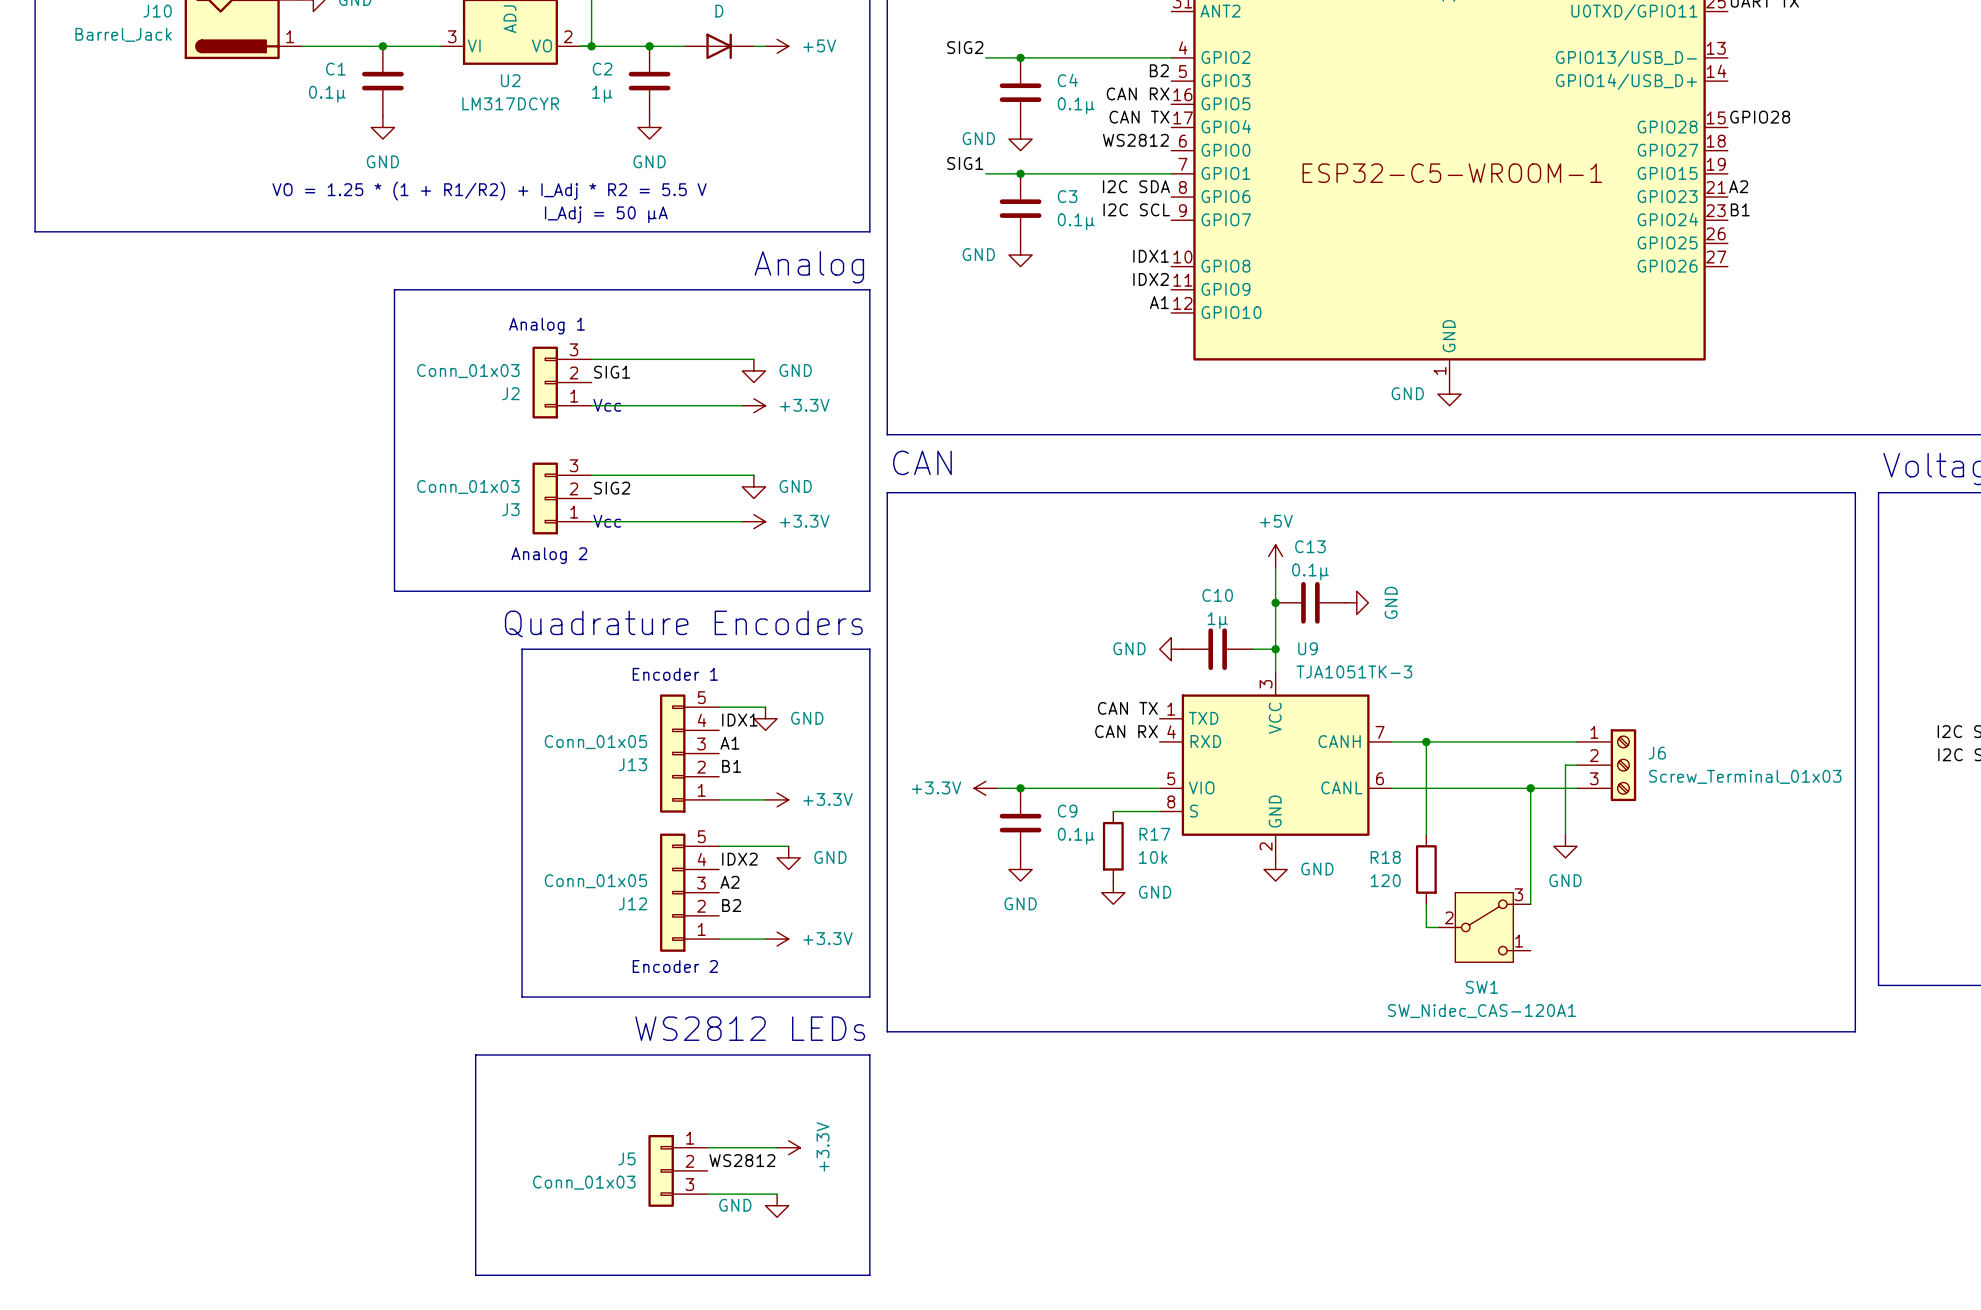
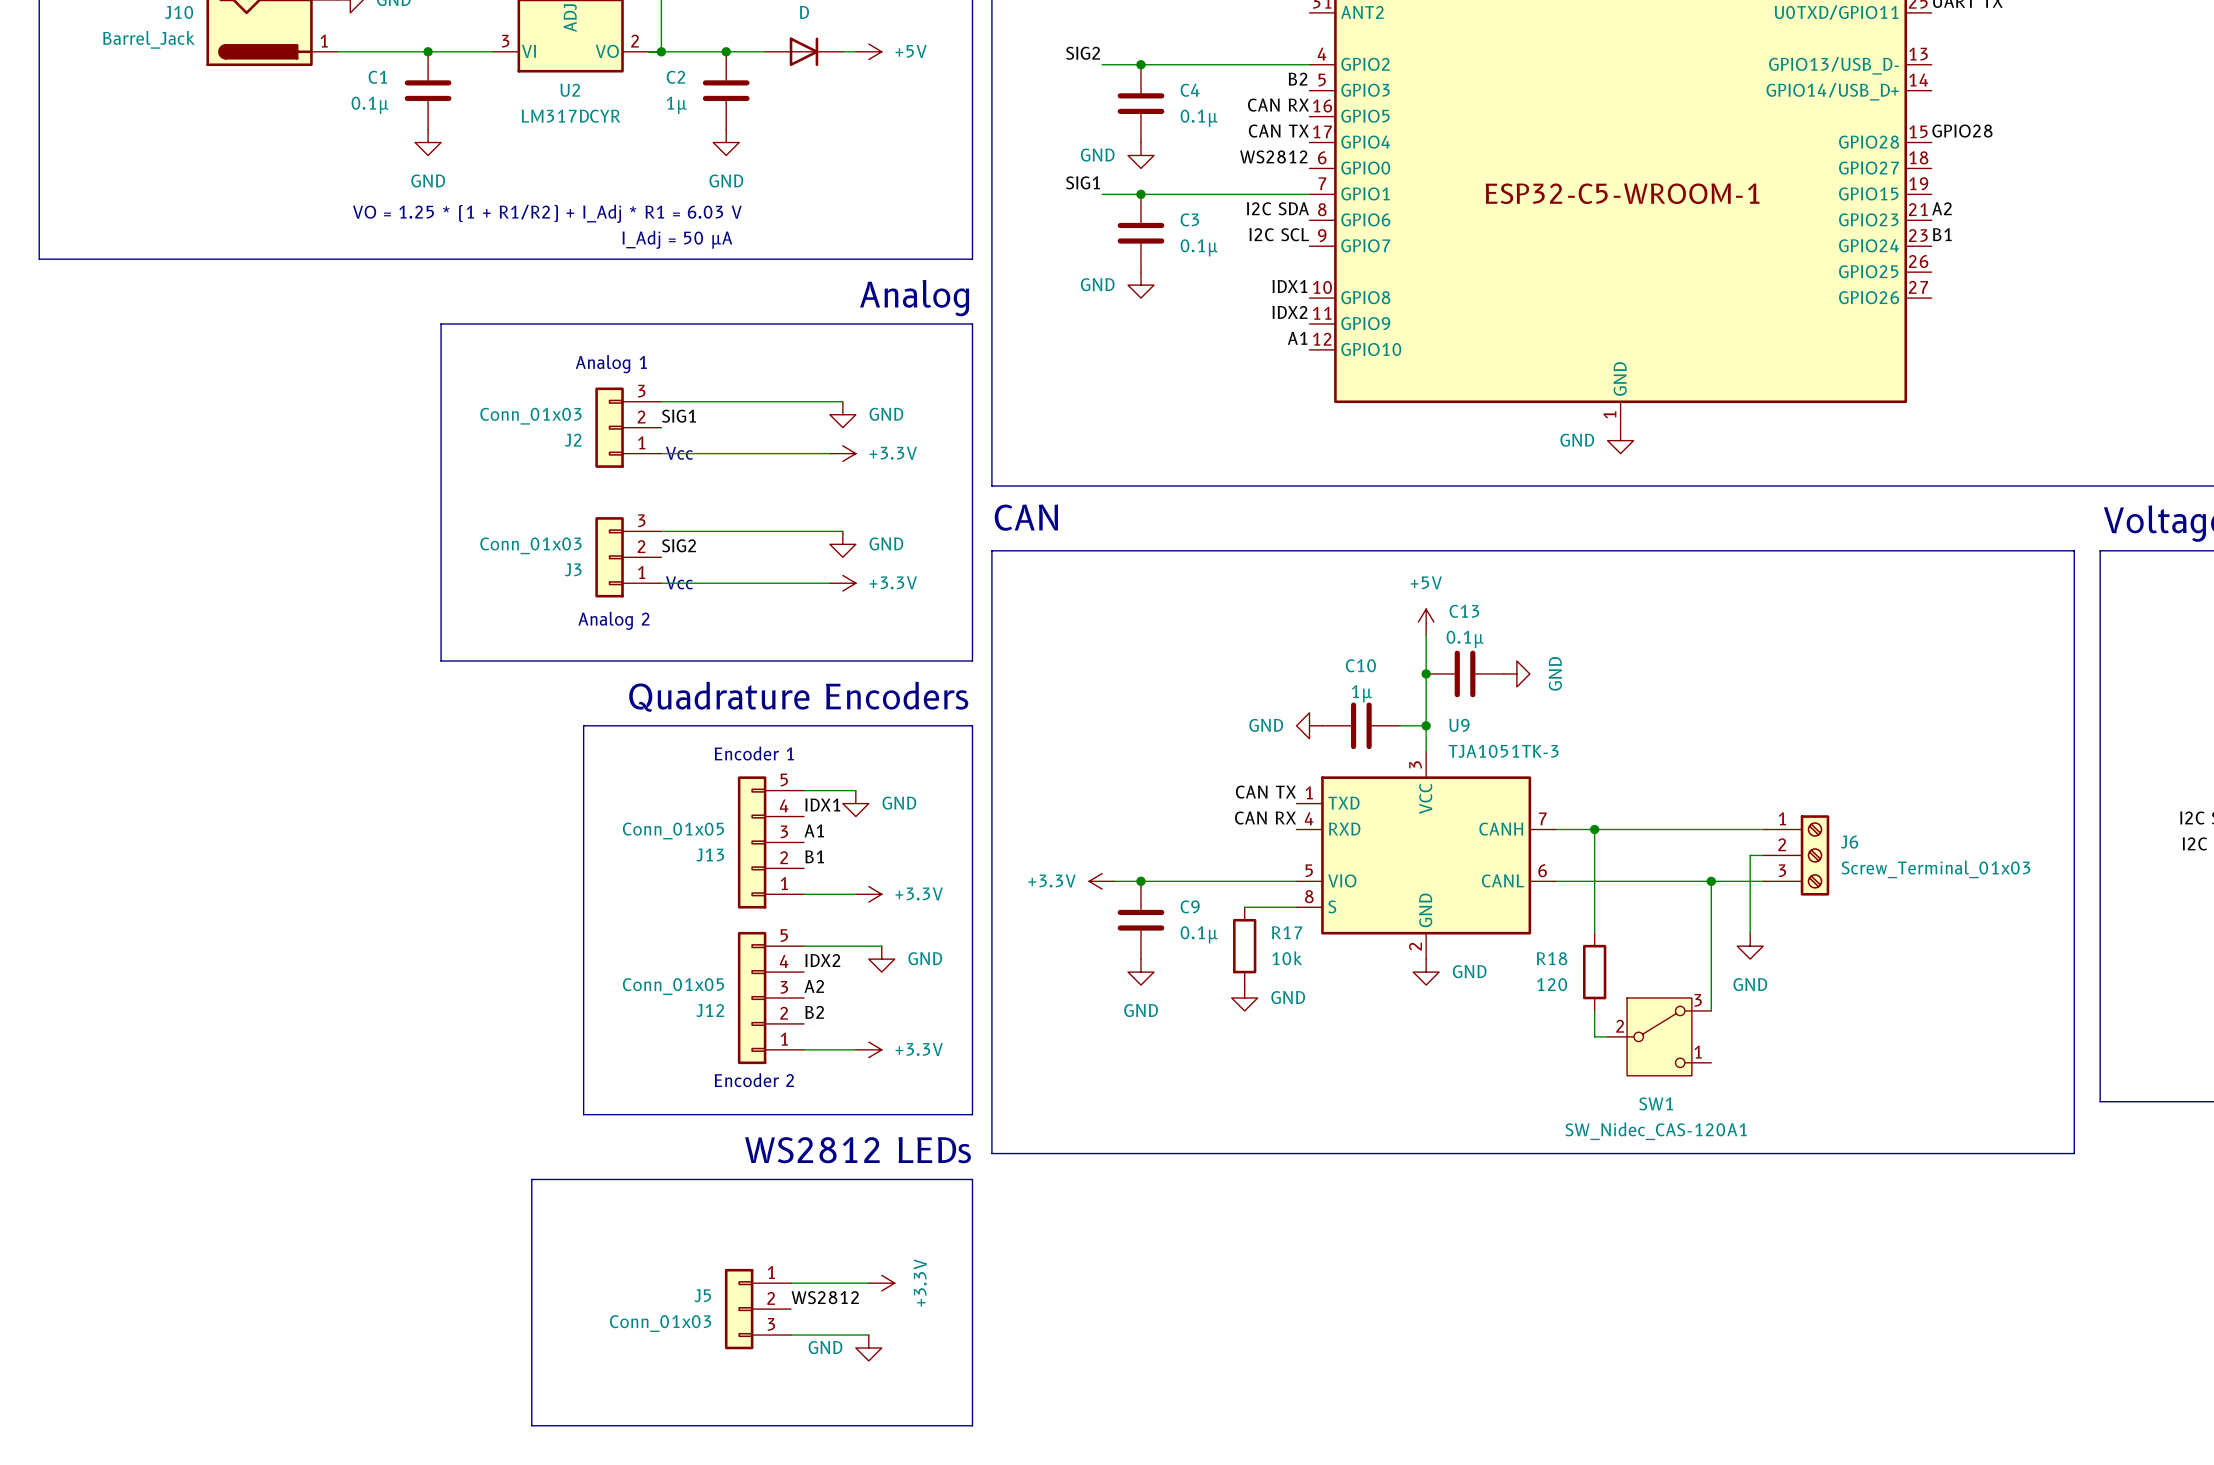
text: VO = 1.25 * (1 + R1/R2) + I_Adj * R2 = 5.5 V (489, 191) -> VO = 1.25 * (1 + R1/R2) + I_Adj * R1 = 6.03 V (547, 213)

